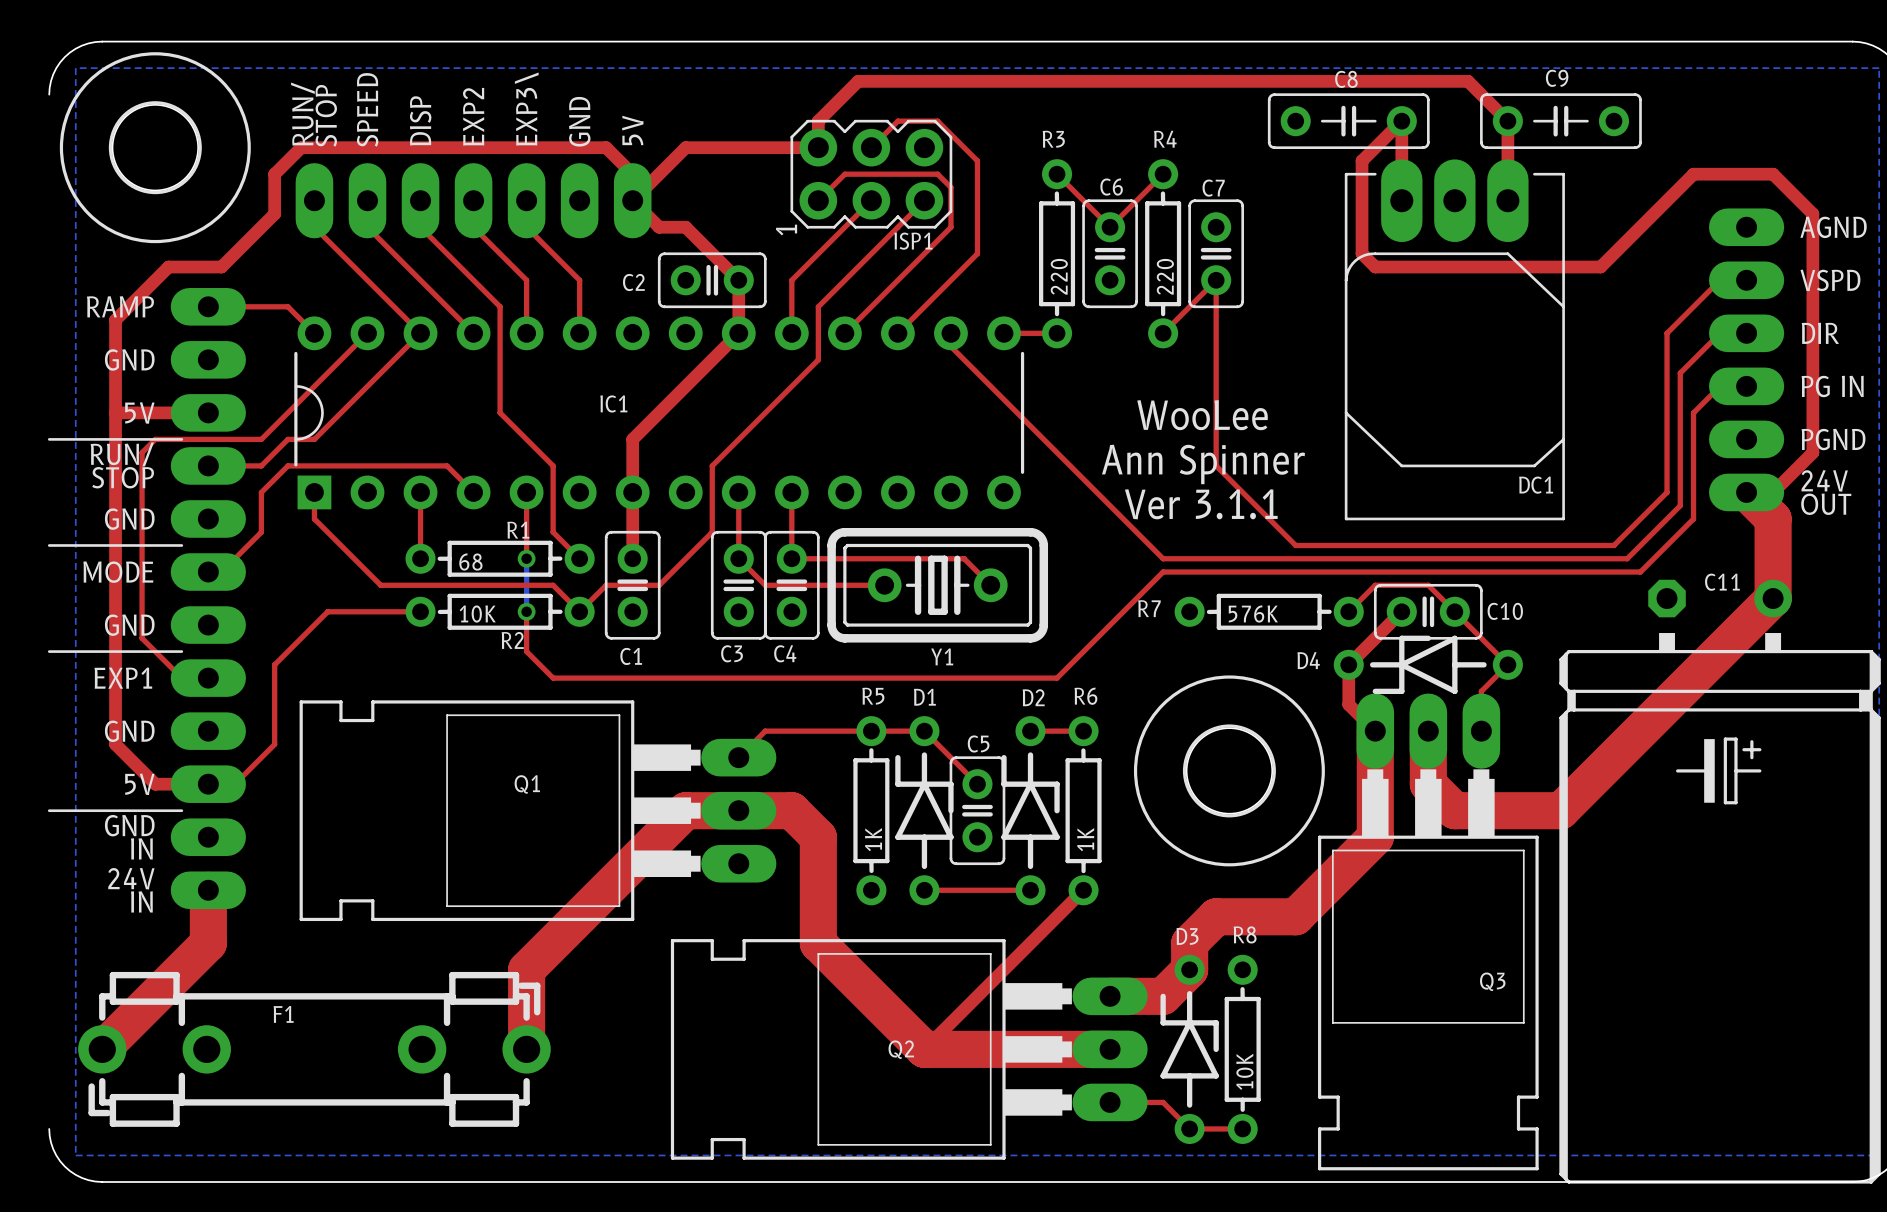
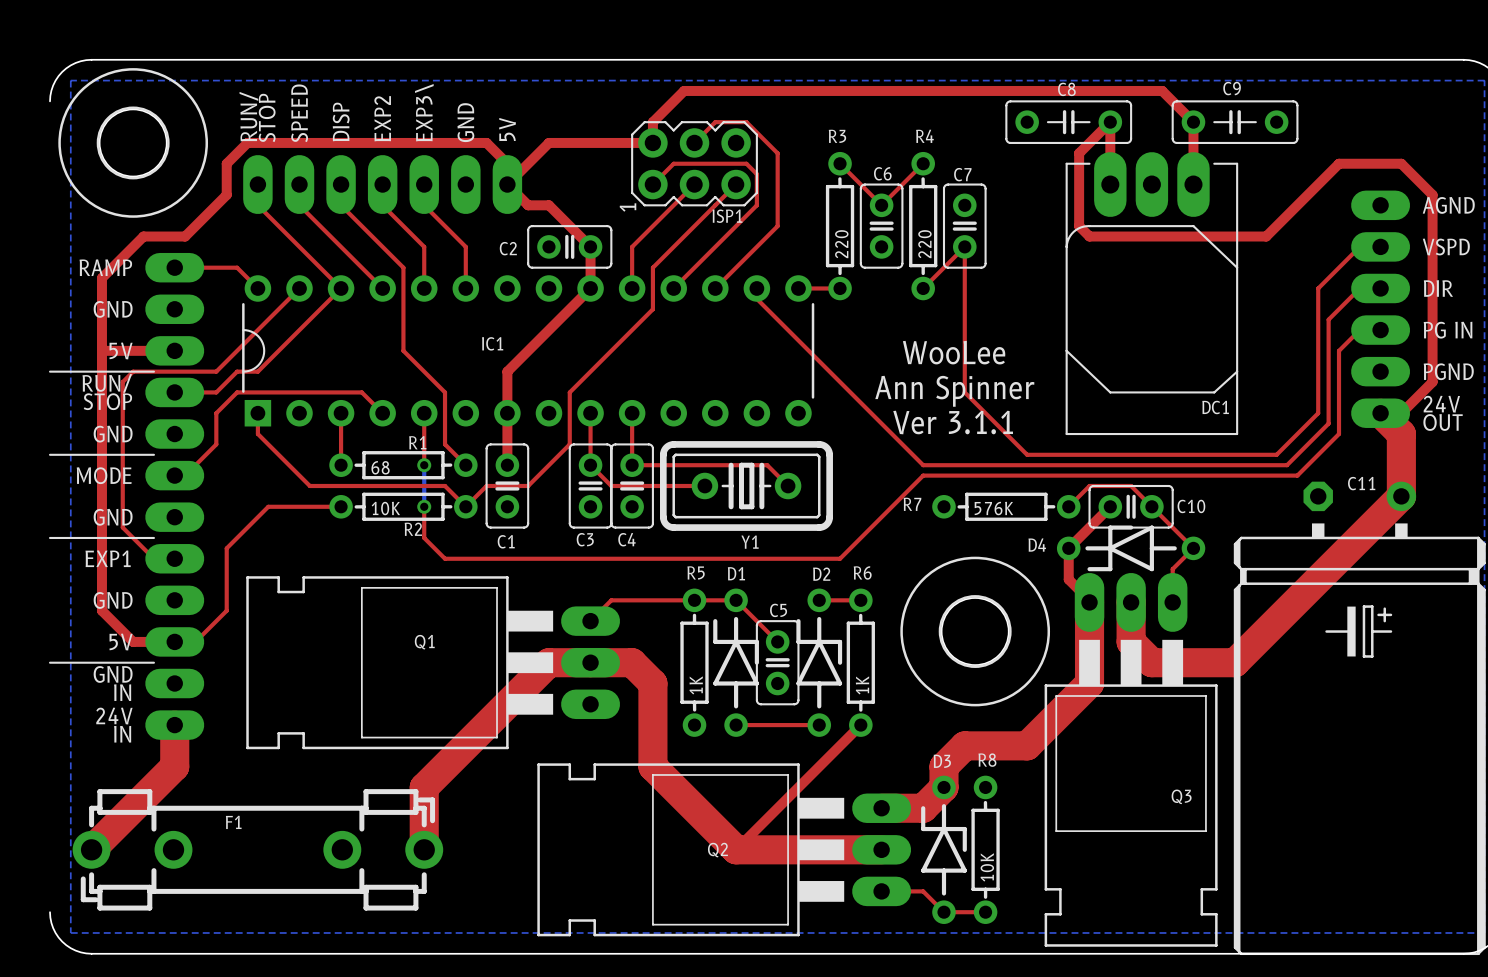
Q3 footprint: [1318, 693, 1539, 1171] -> [1044, 572, 1218, 947]
Q1 footprint: [299, 700, 777, 922] -> [246, 576, 621, 750]
Q2 footprint: [670, 939, 1148, 1160] -> [537, 763, 912, 937]

